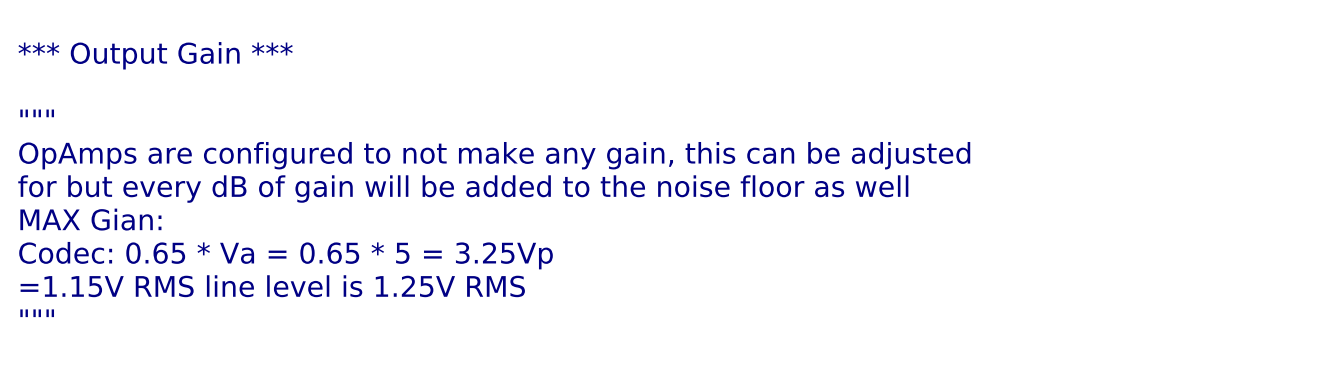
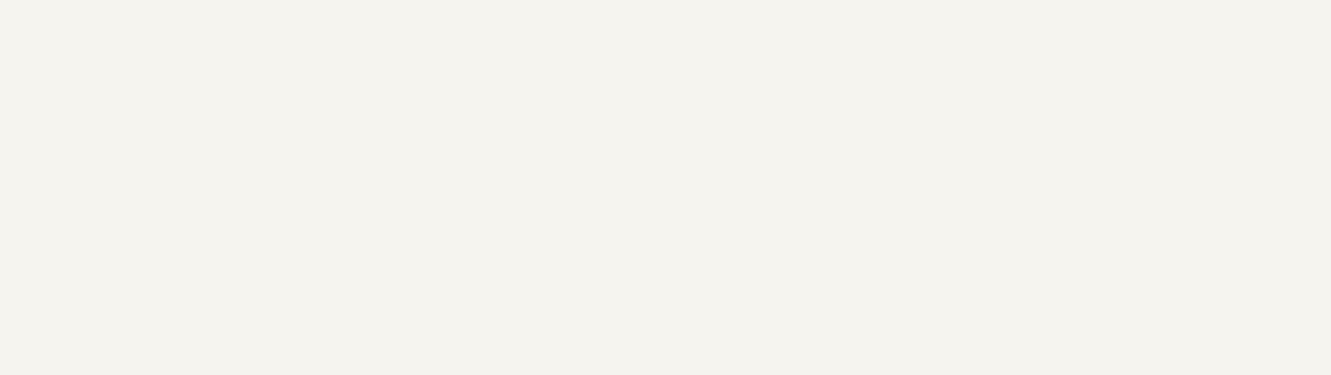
text: *** Output Gain *** (155, 55) -> none
text: """ (37, 113) -> none
text: OpAmps are configured to not make any gain, this can be adjusted (494, 155) -> none
text: for but every dB of gain will be added to the noise floor as well (463, 189) -> none
text: MAX Gian: (90, 219) -> none
text: Codec: 0.65 * Va = 0.65 * 5 = 3.25Vp (286, 255) -> none
text: =1.15V RMS line level is 1.25V RMS (272, 286) -> none
text: """ (37, 313) -> none

